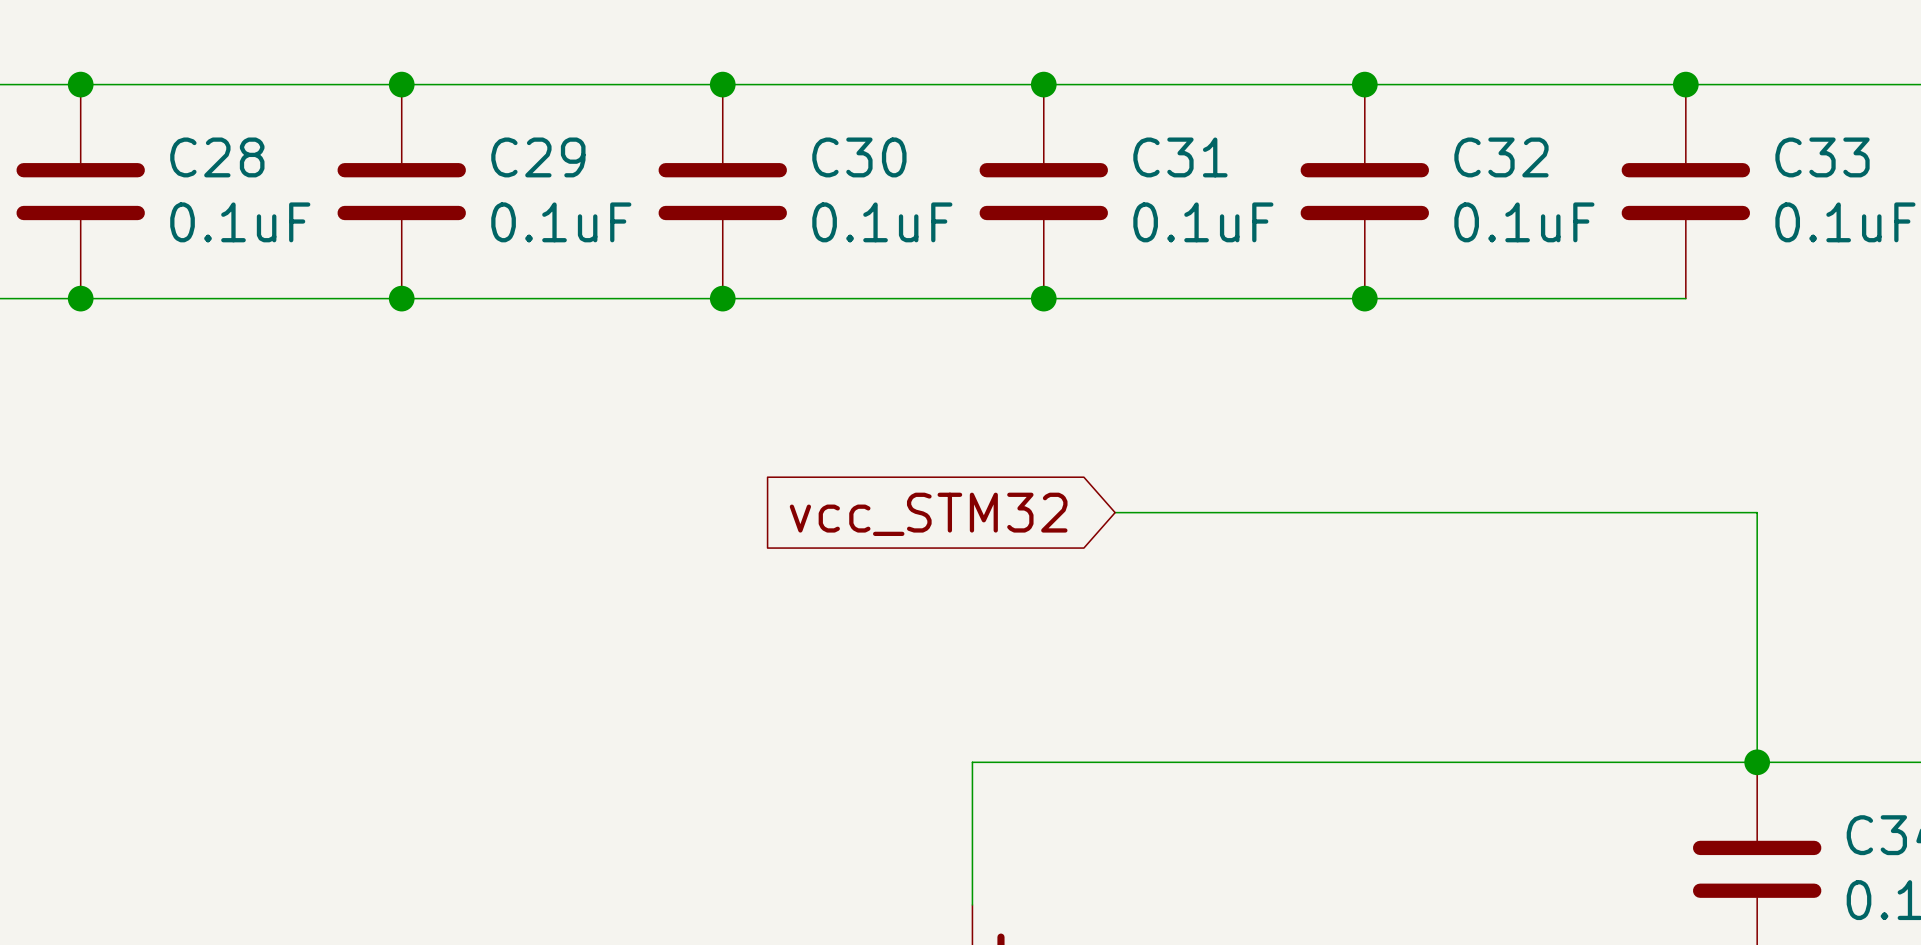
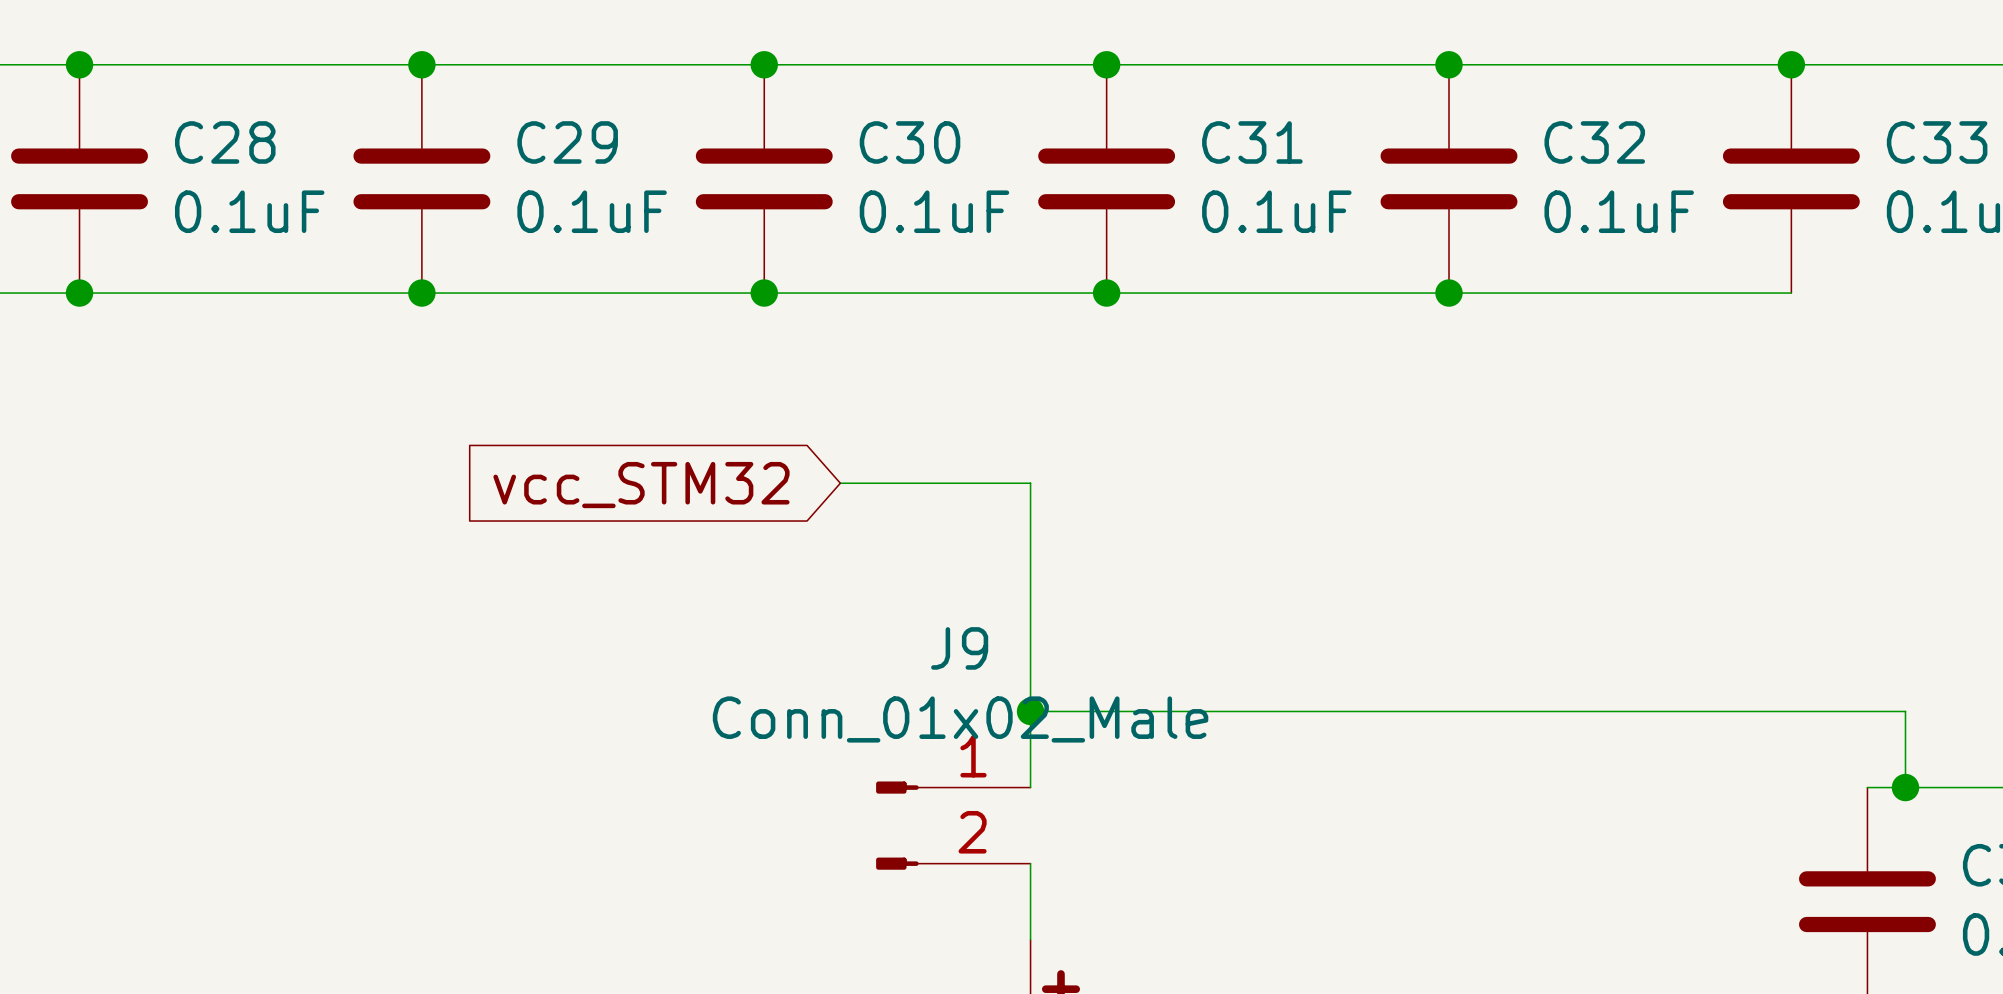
wire: none -> (840, 483) (1030, 483) (1030, 787)
wire: (1115, 512) (1757, 512) (1757, 762) (972, 762) (972, 833) -> none
global label position: vcc_STM32 (928, 514) -> vcc_STM32 (641, 485)
wire: none -> (1030, 711) (1905, 711) (1905, 787)
junction: none -> (1030, 711)
junction position: (1757, 762) -> (1905, 787)
J9: none -> Conn_01x02_Male (953, 825)

